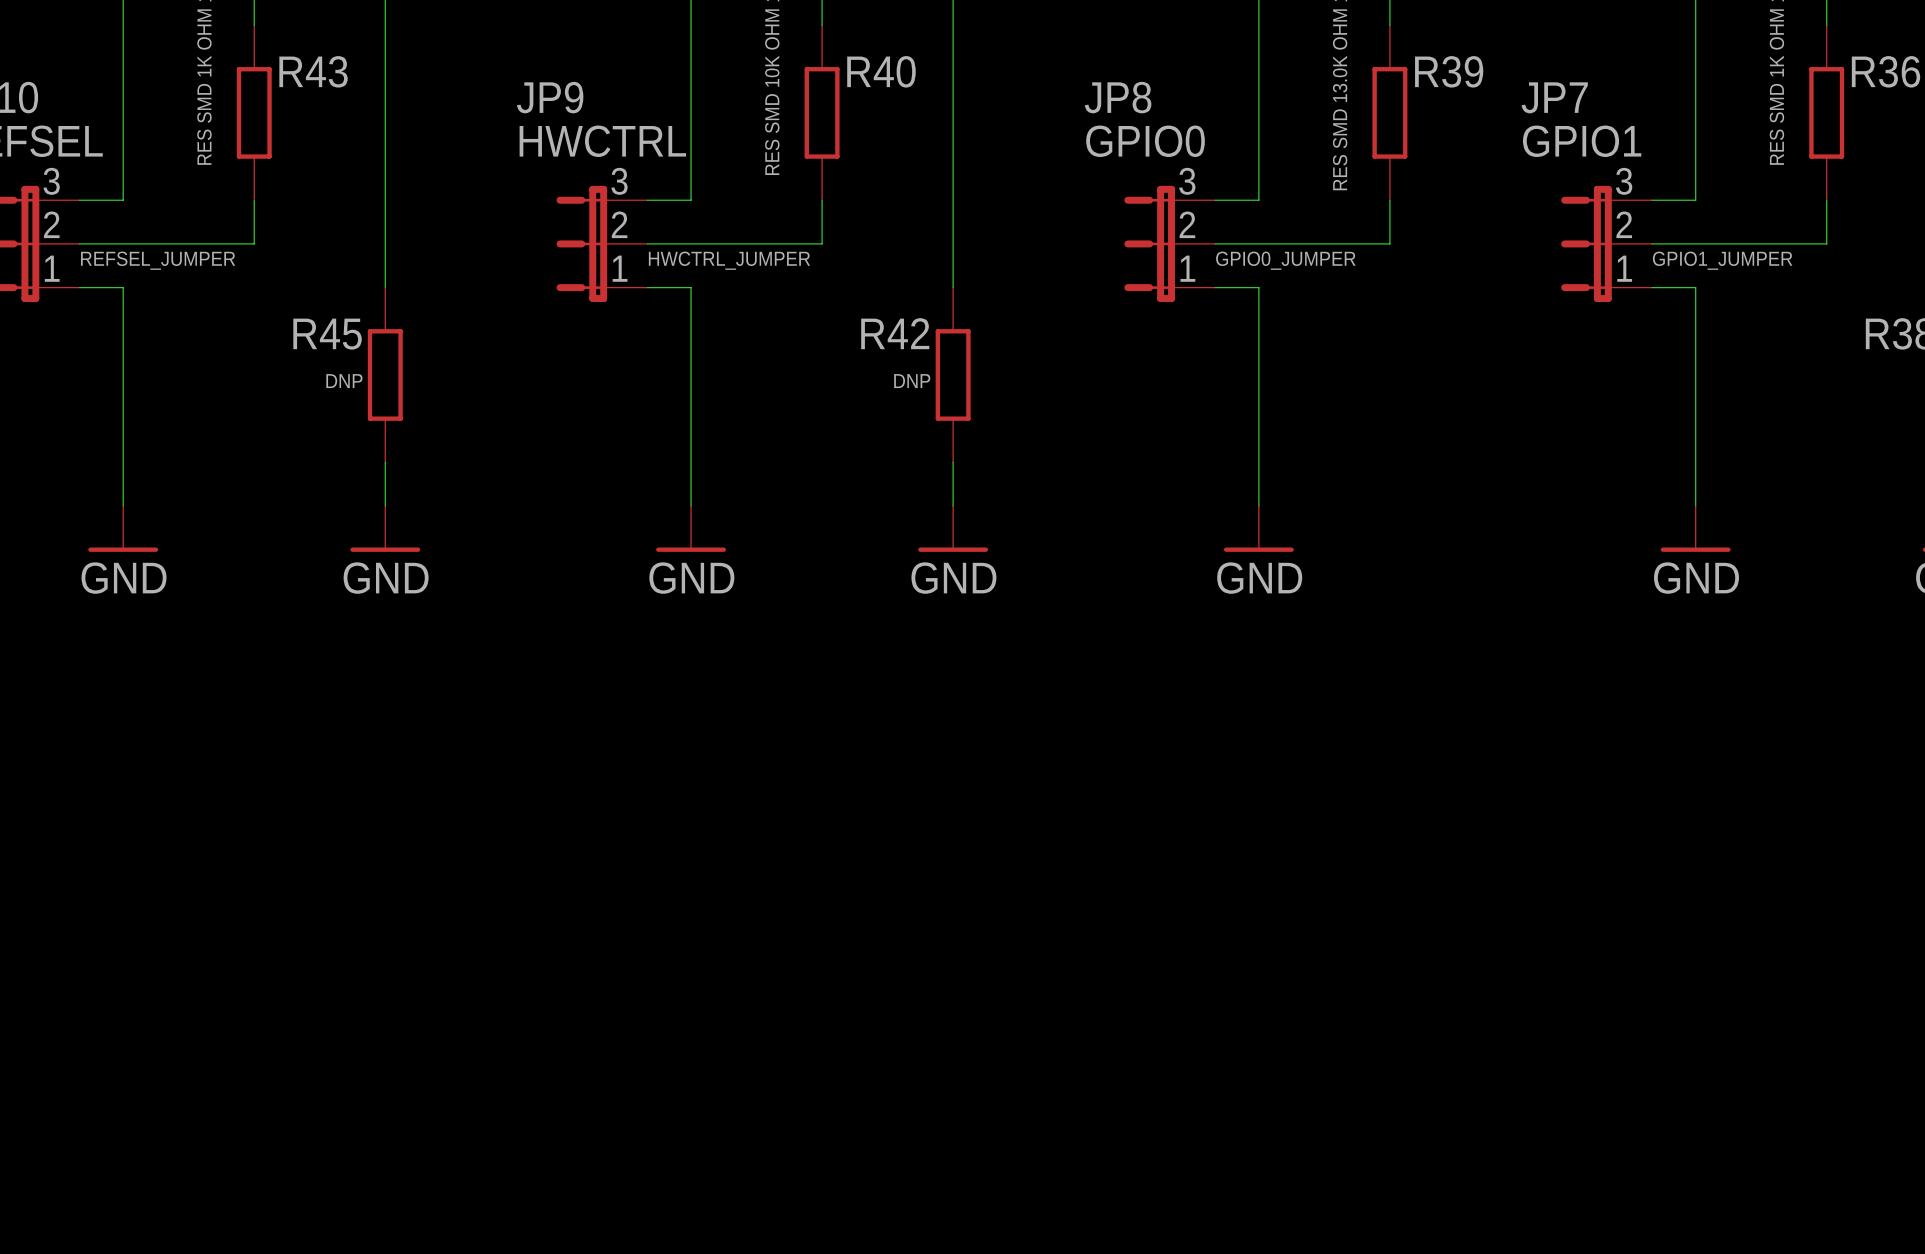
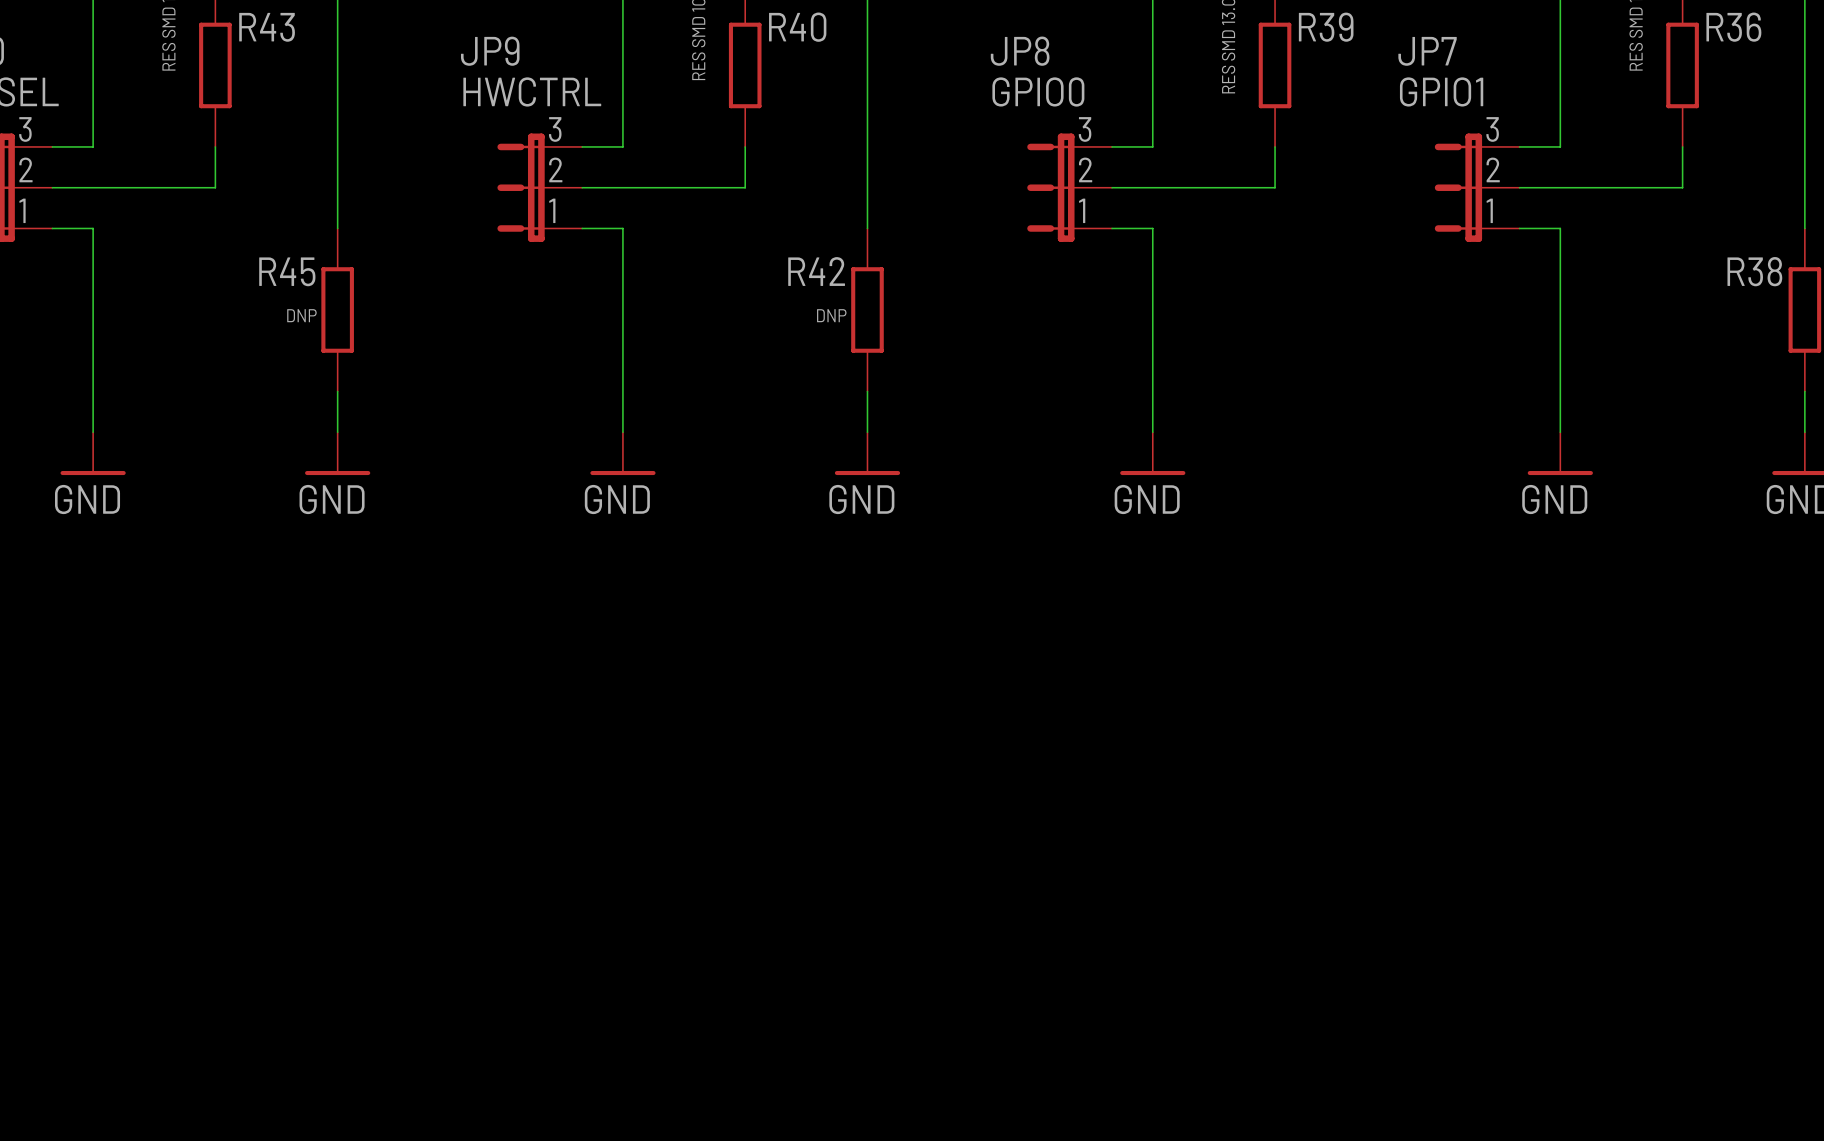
label: REFSEL_JUMPER (158, 260) -> none
label: HWCTRL_JUMPER (729, 260) -> none
label: GPIO0_JUMPER (1285, 260) -> none
label: GPIO1_JUMPER (1722, 260) -> none

